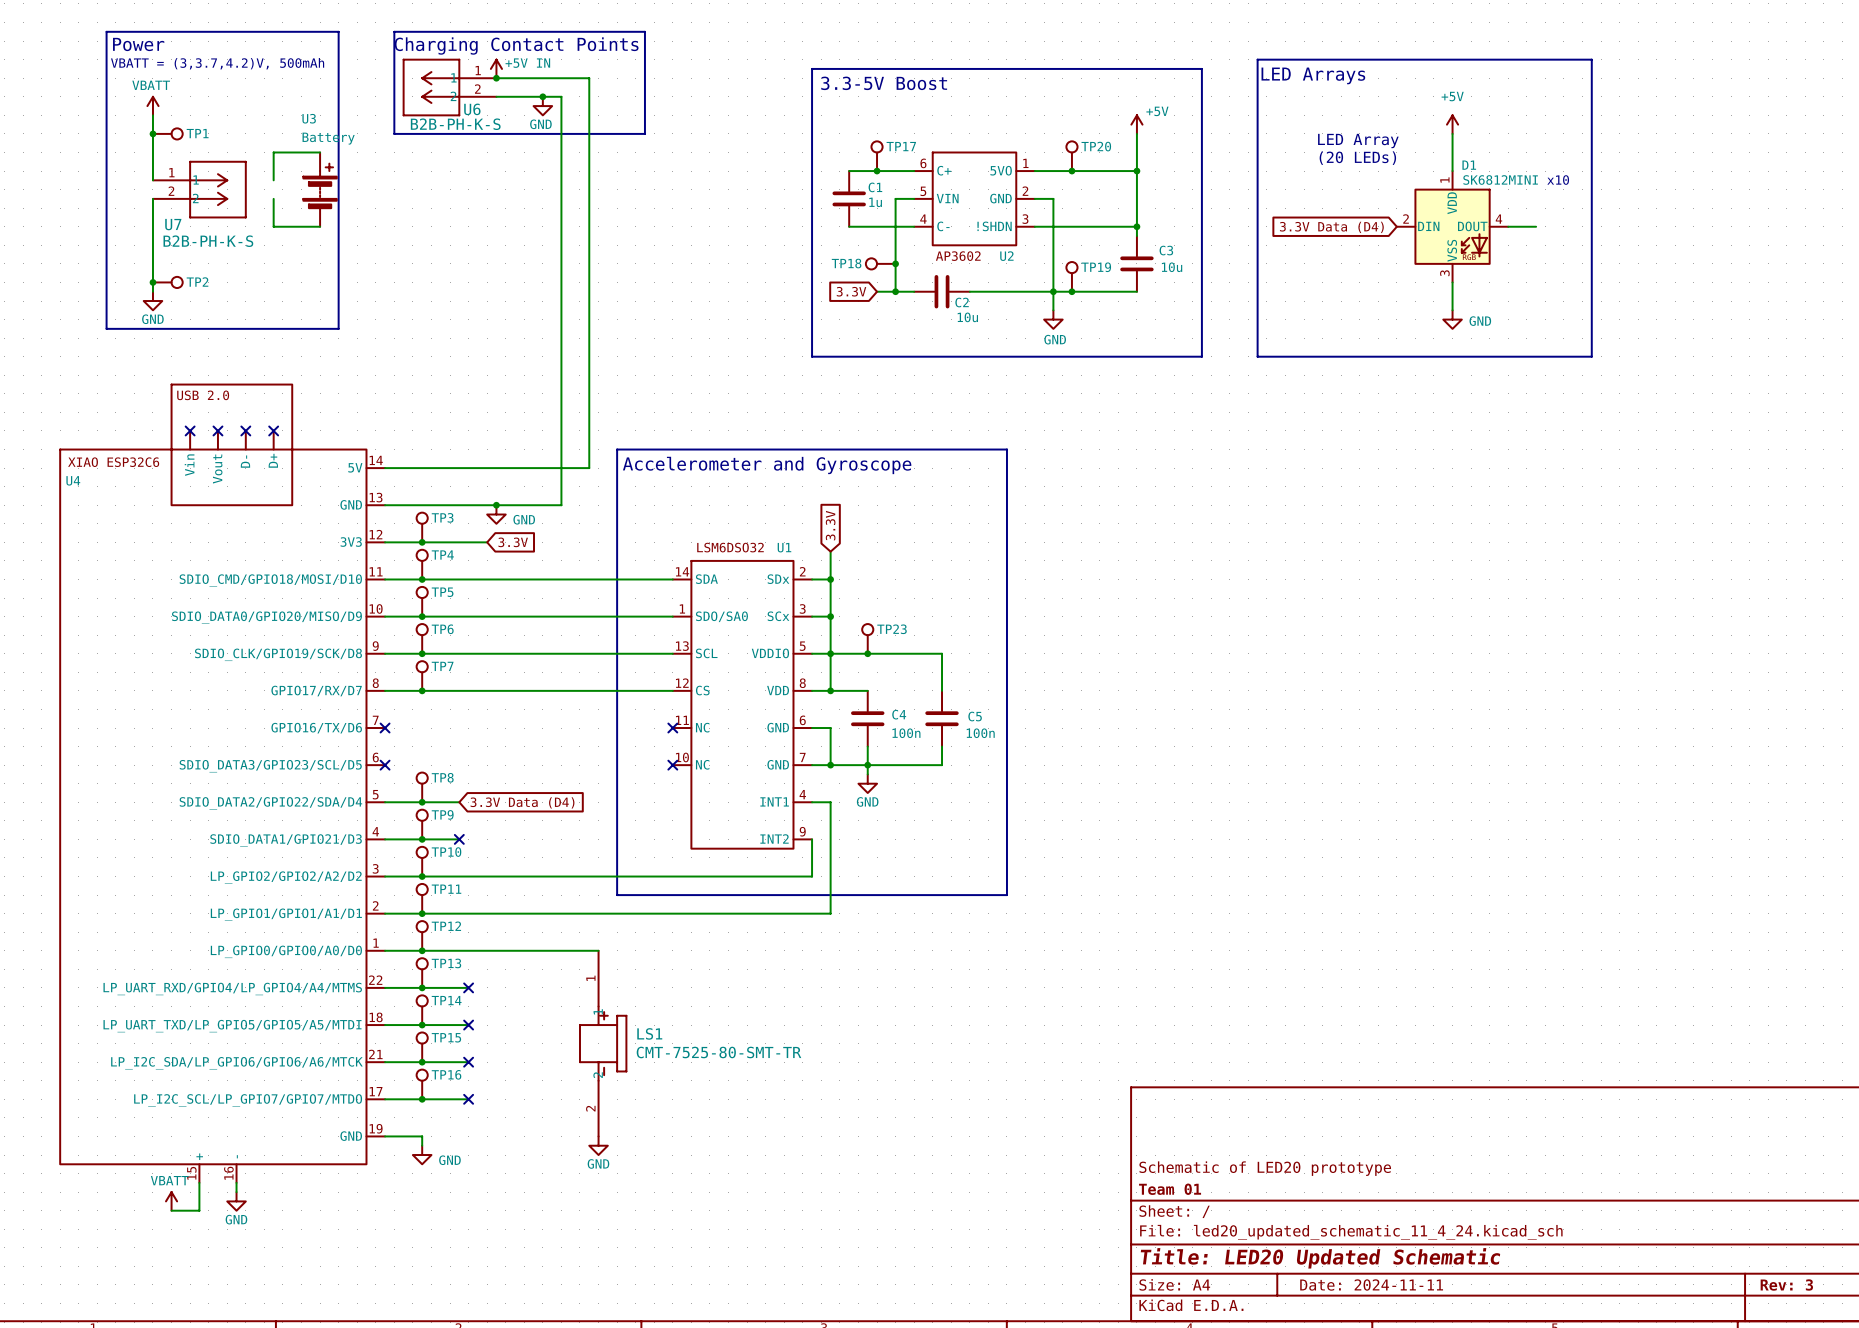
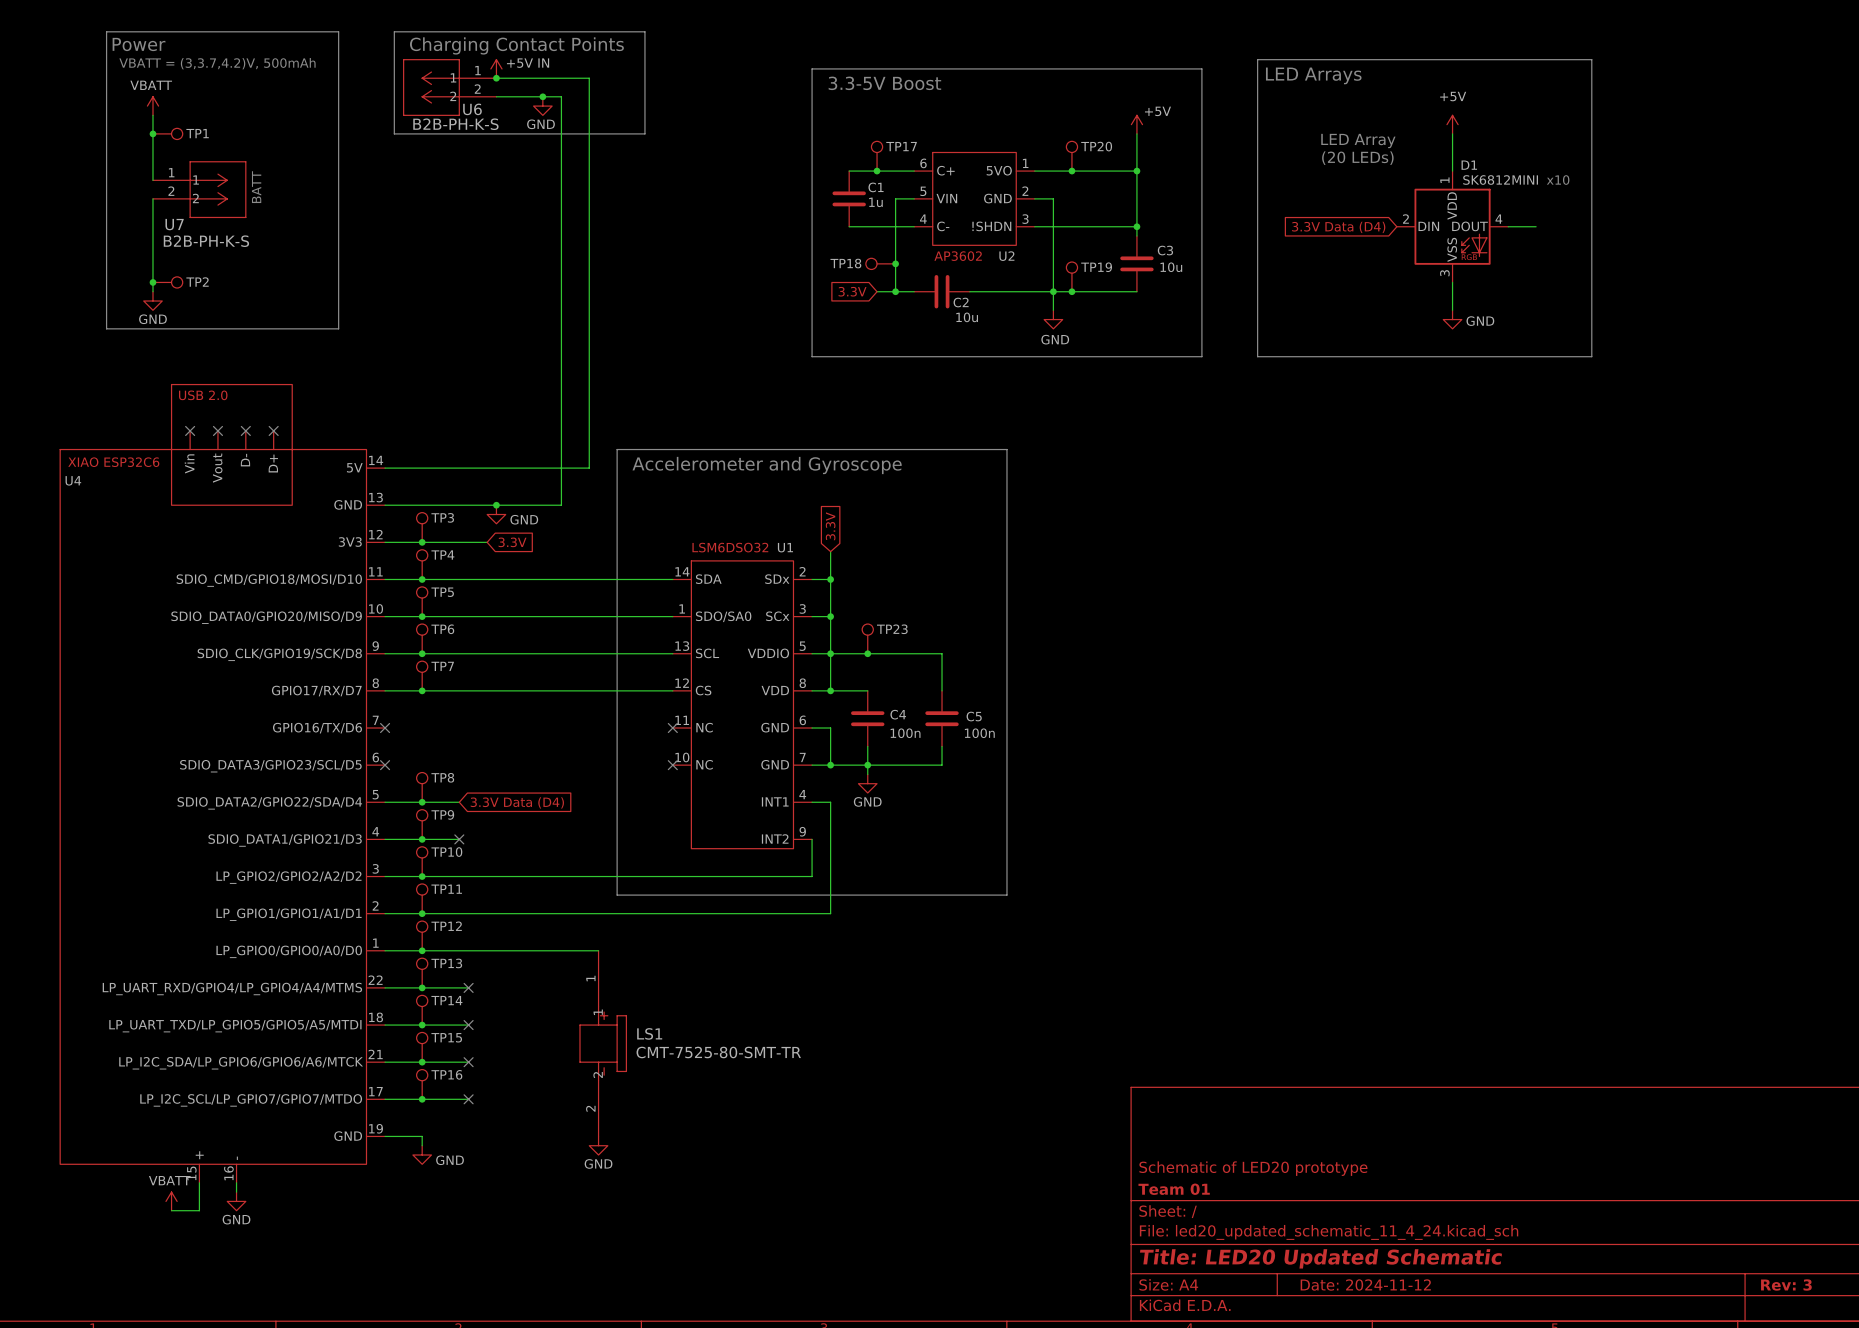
wire: (320, 152) (273, 152) (273, 180) -> none
text: none -> BATT (256, 187)
U3: Battery (320, 189) -> none
wire: (273, 198) (273, 226) (320, 226) -> none
title block: Date: 2024-11-11 (1371, 1284) -> Date: 2024-11-12 (1365, 1284)

